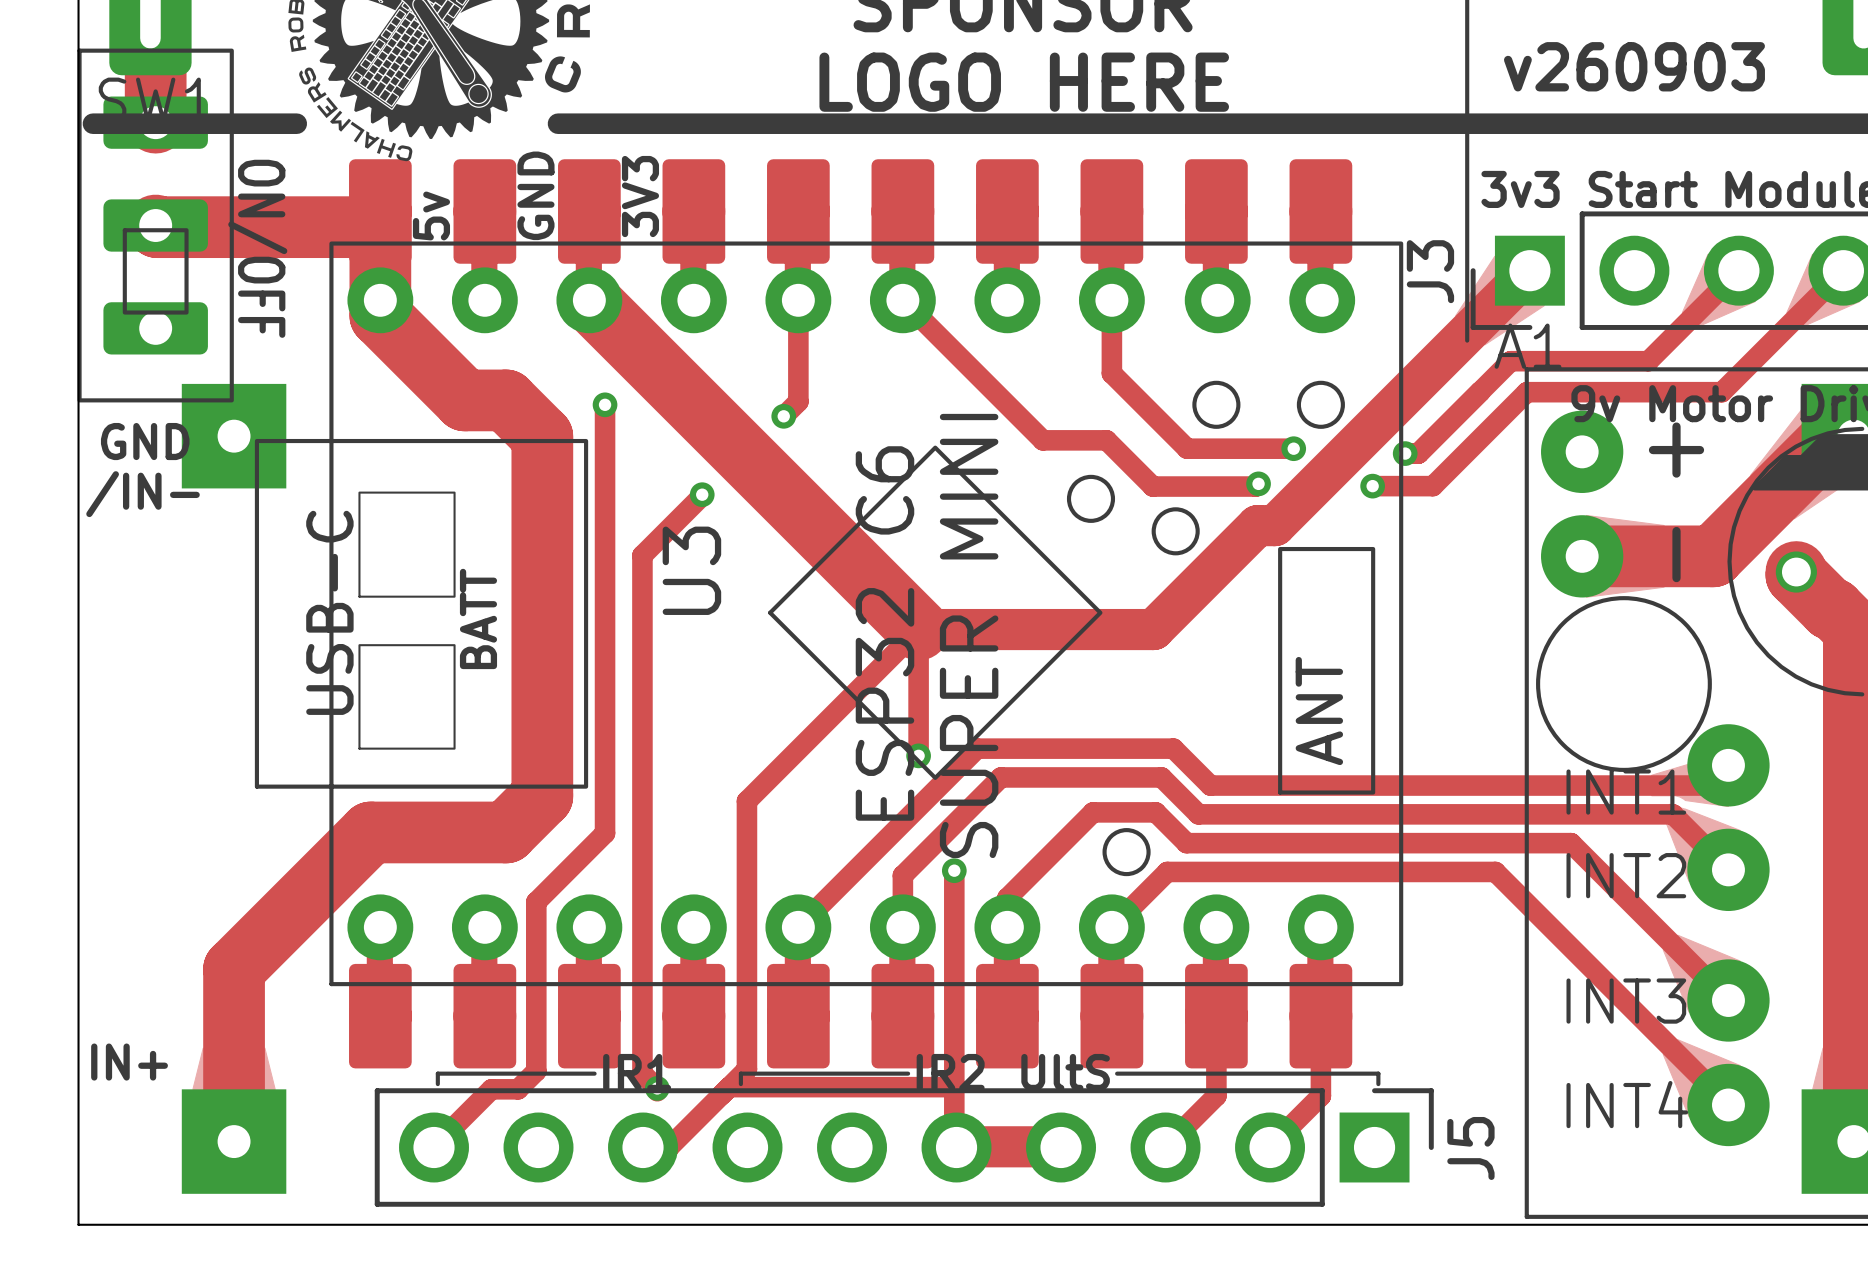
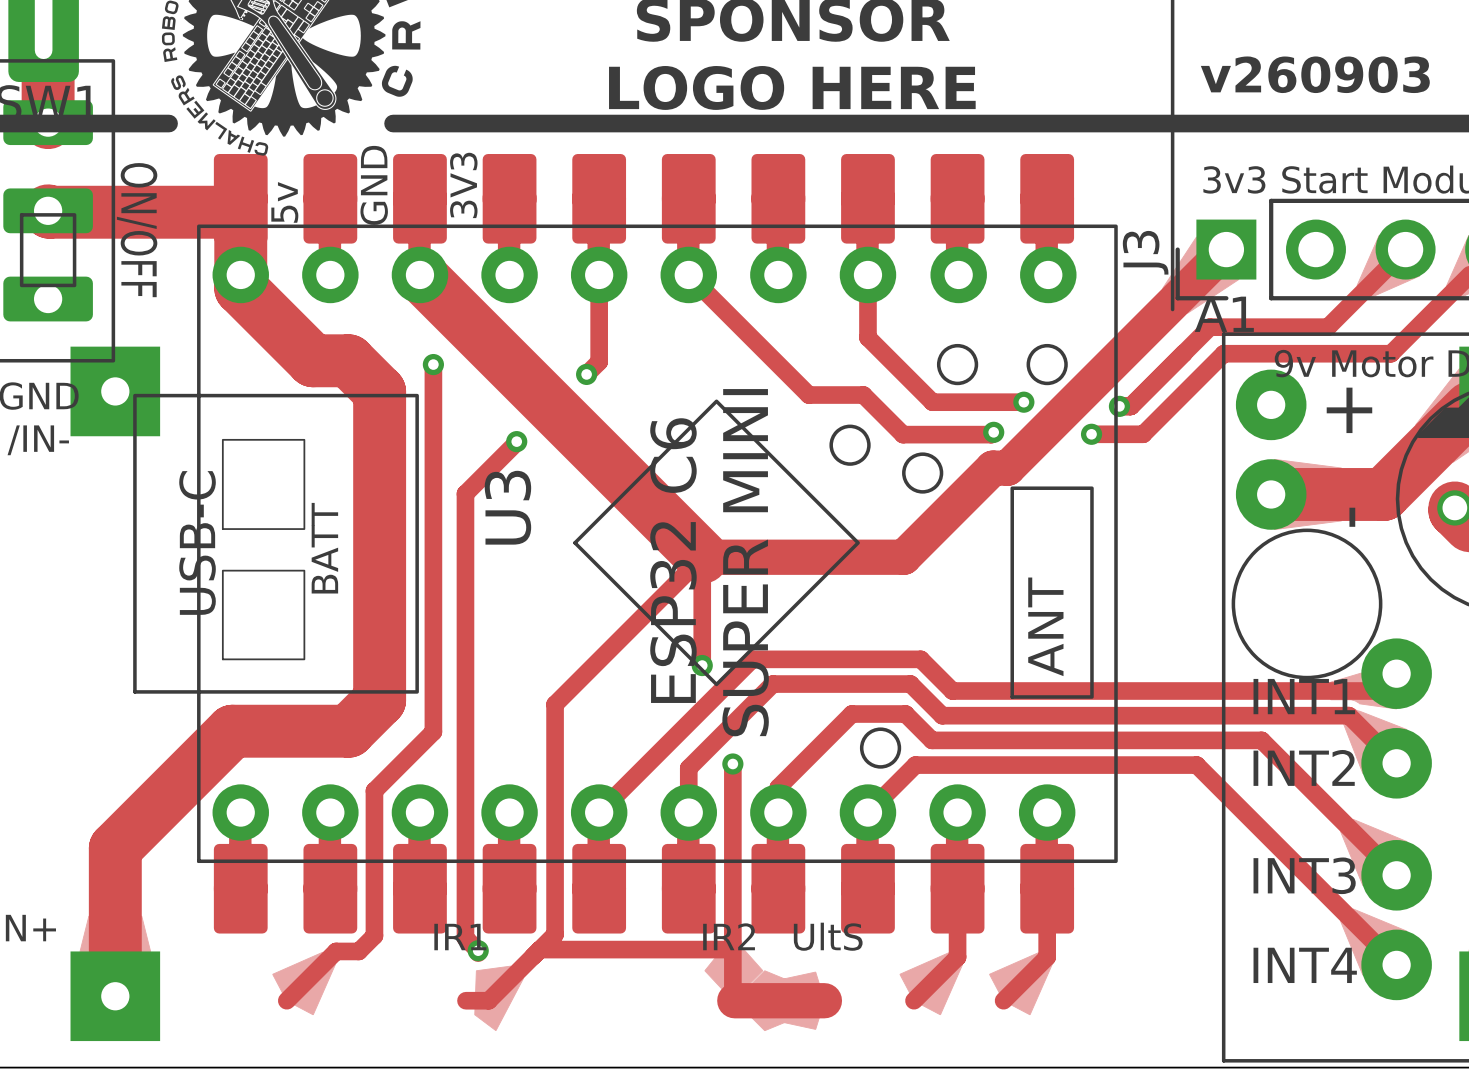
line: (594, 1073) (437, 1073) (437, 1084) -> none
line: (908, 1073) (740, 1073) (740, 1084) -> none
line: (1117, 1073) (1378, 1073) (1378, 1084) -> none
J5: (904, 1147) -> none

